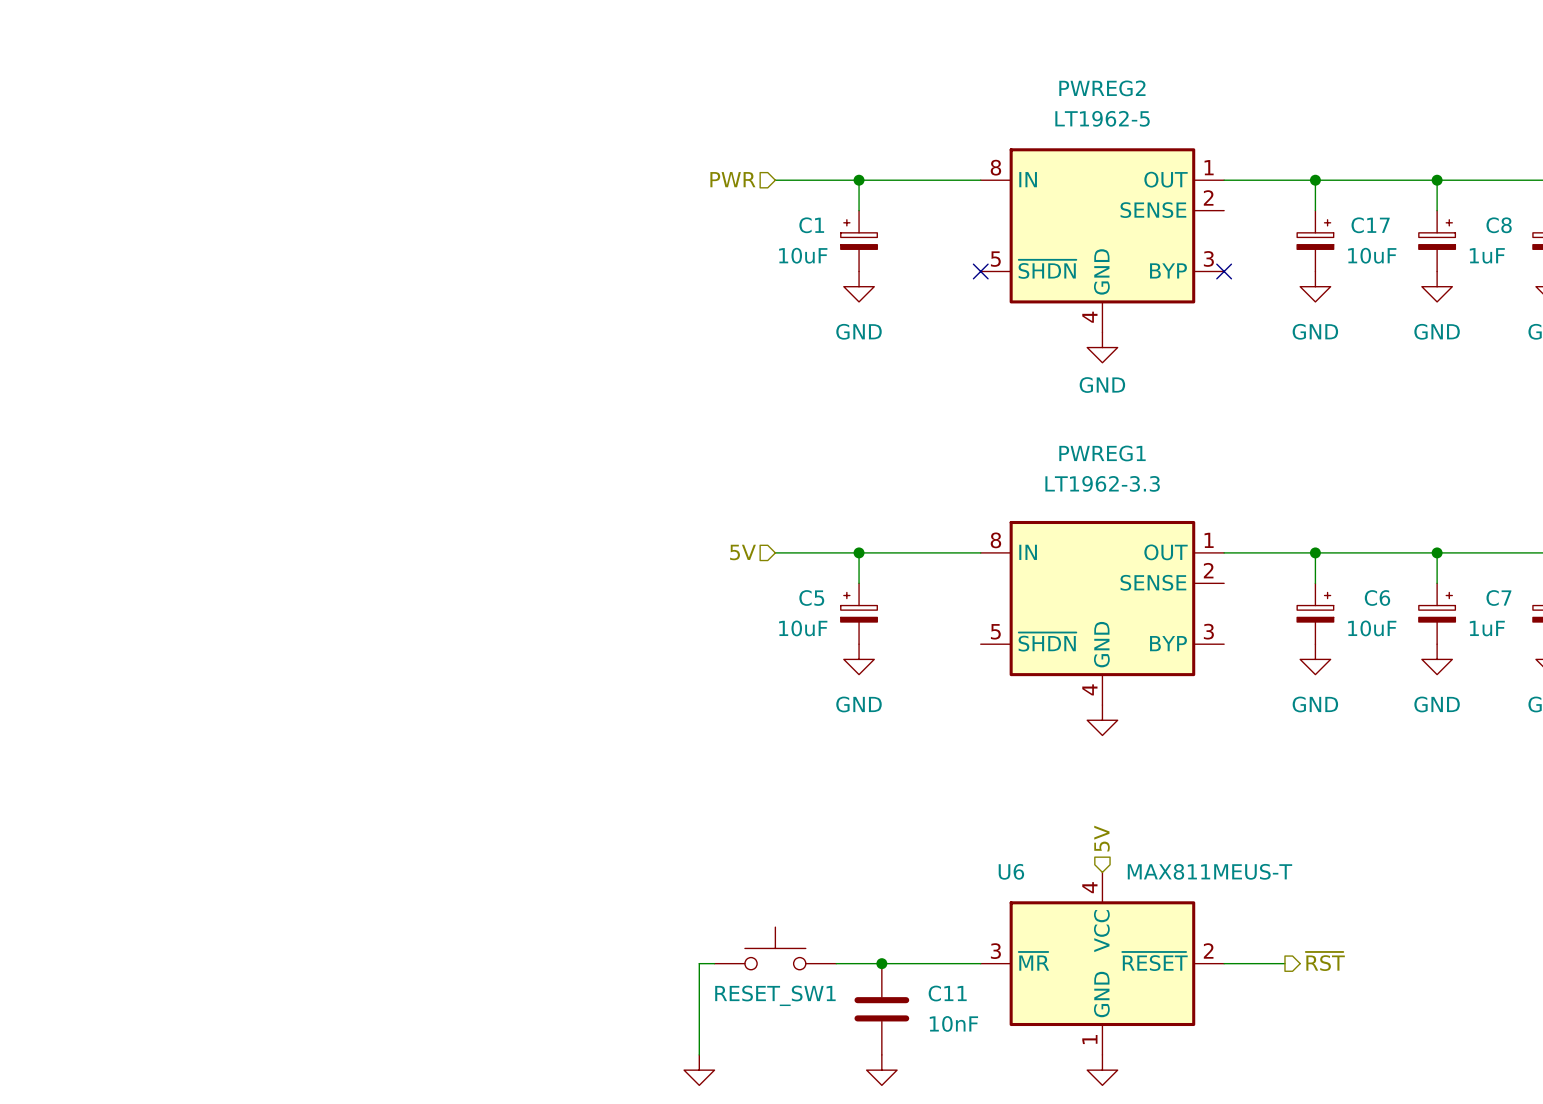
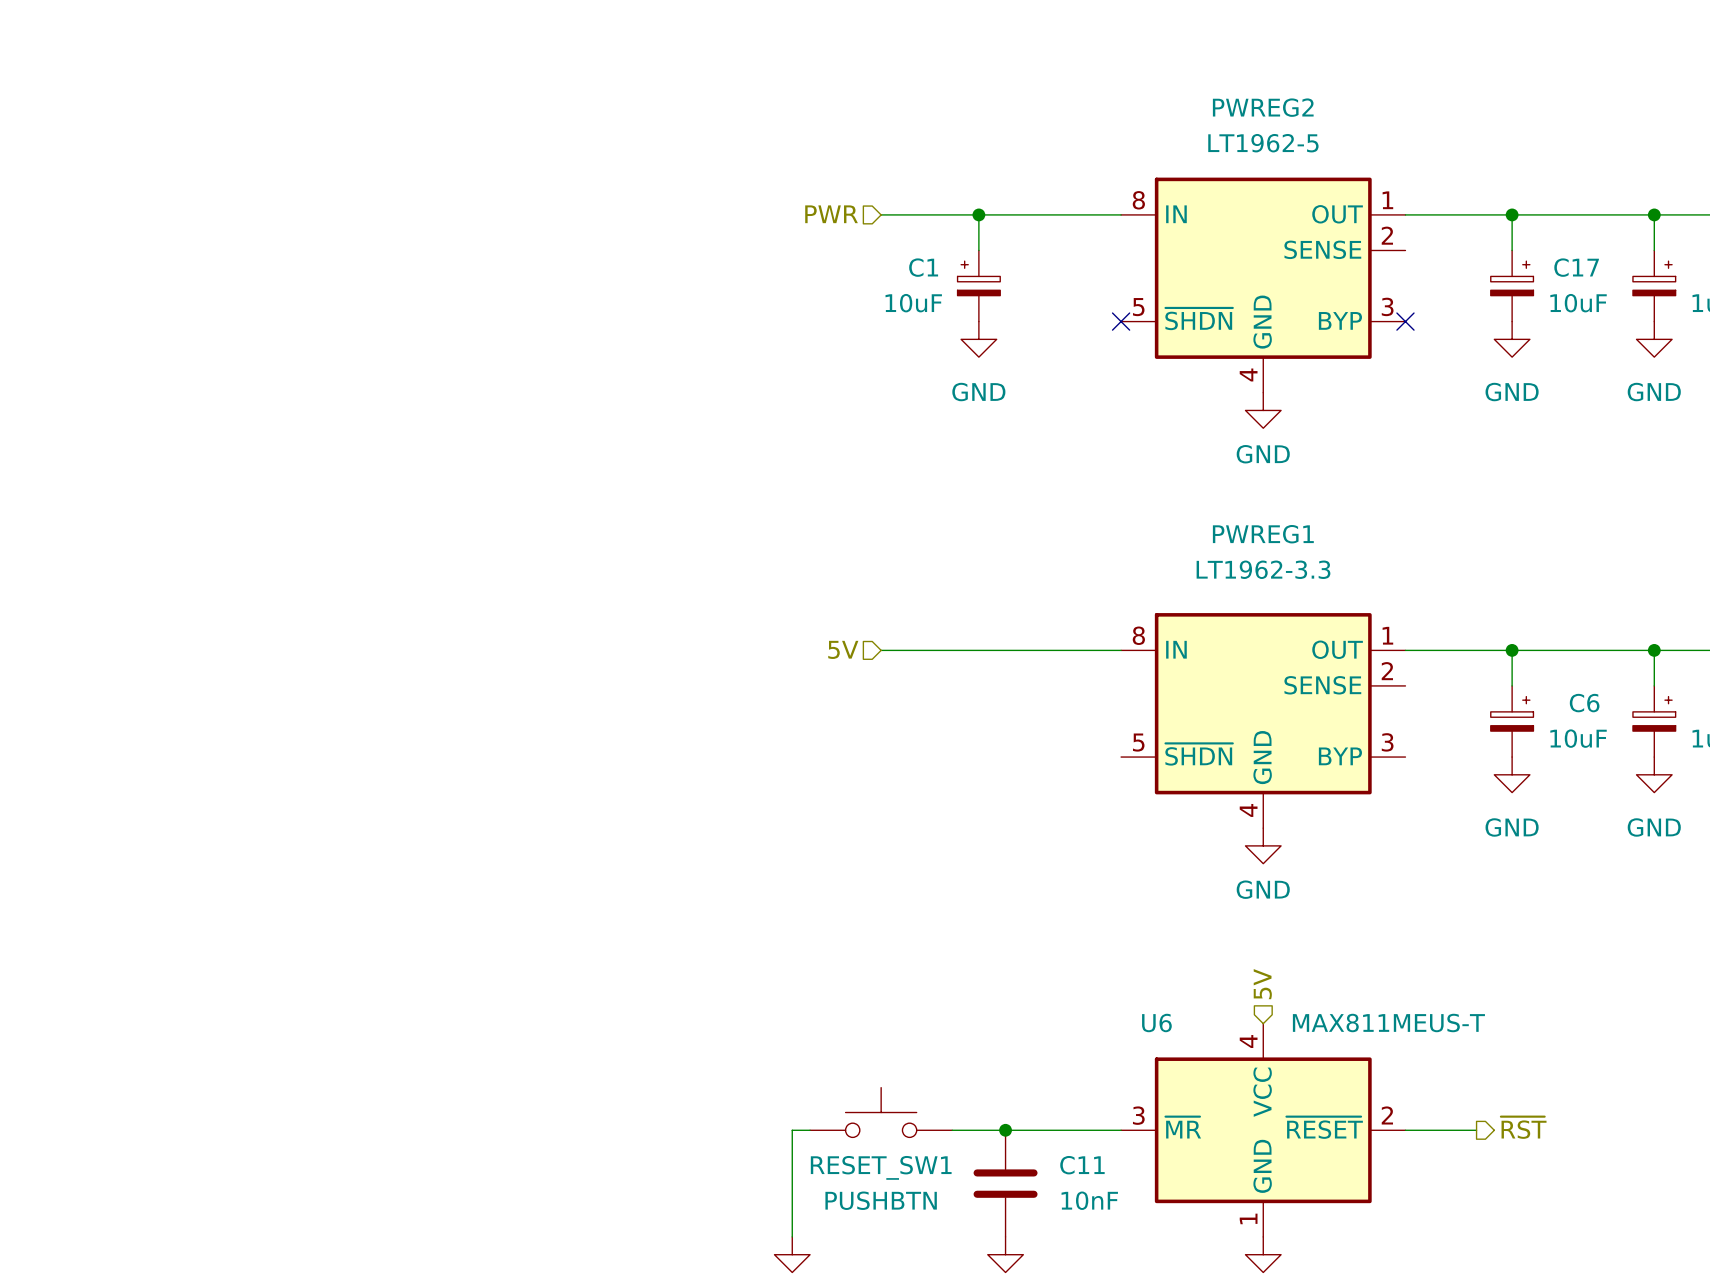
wire: (859, 552) (859, 583) -> none
junction: (859, 552) -> none
C5: 10uF (859, 613) -> none
power symbol: GND (859, 659) -> none
power symbol text: none -> GND (1263, 889)
RESET_SW1 value: none -> PUSHBTN (881, 1200)

